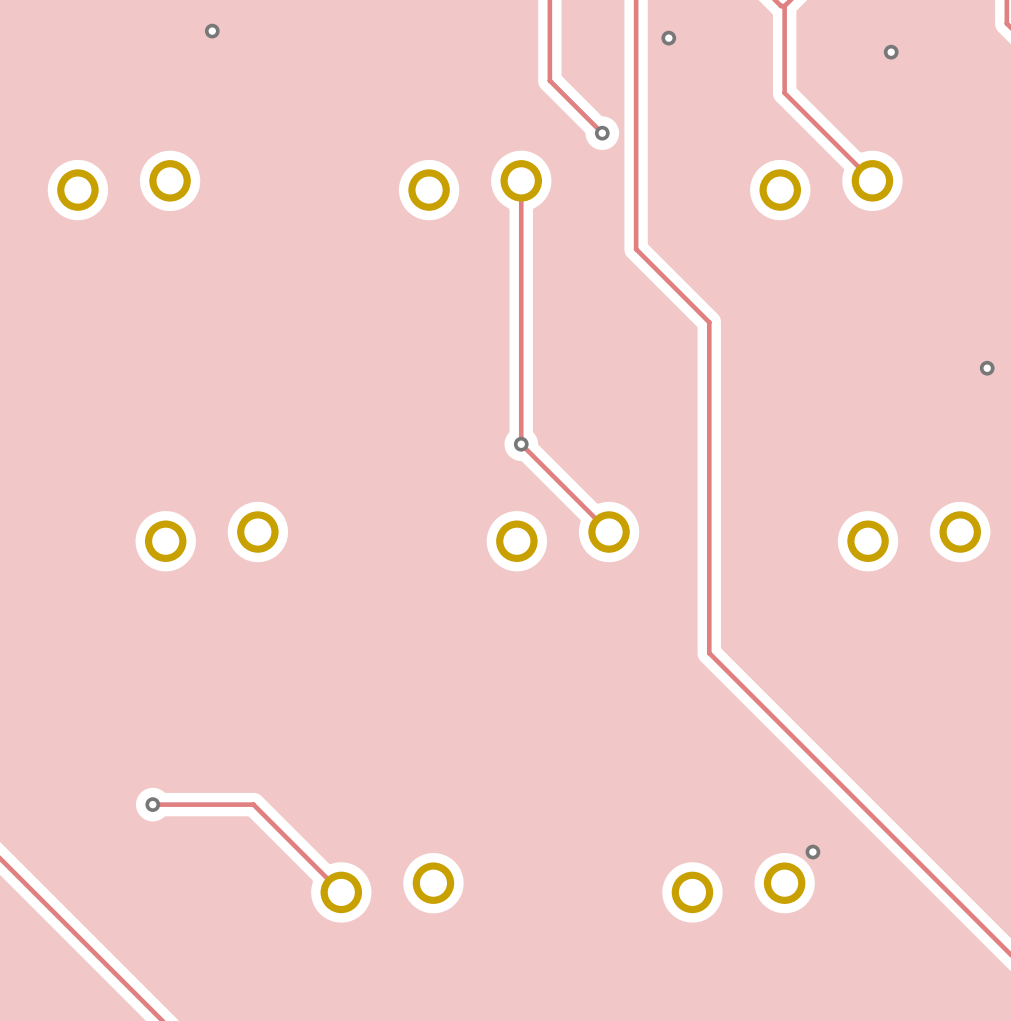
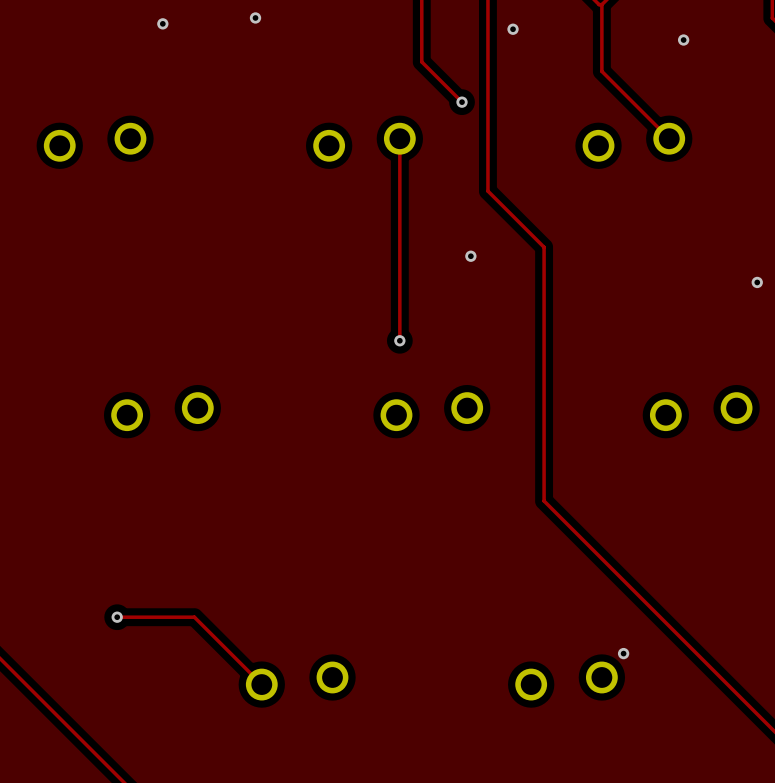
via: none -> (255, 17)
via: none -> (470, 256)
track: (521, 444) (609, 532) -> none

